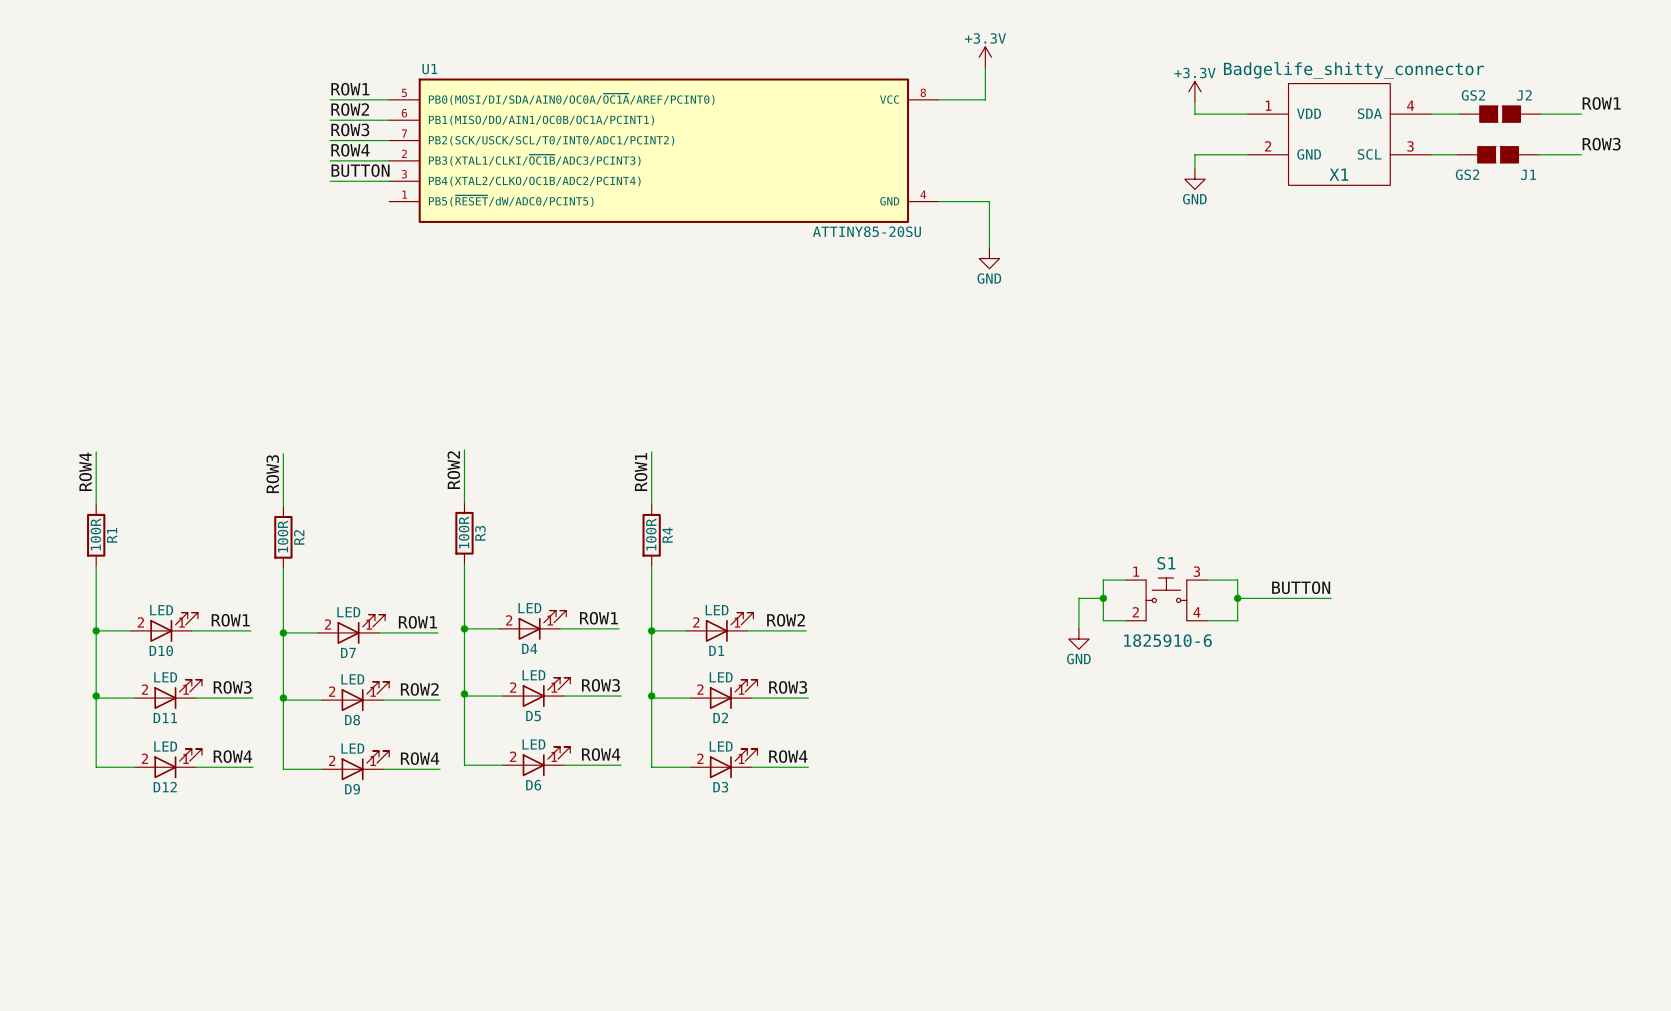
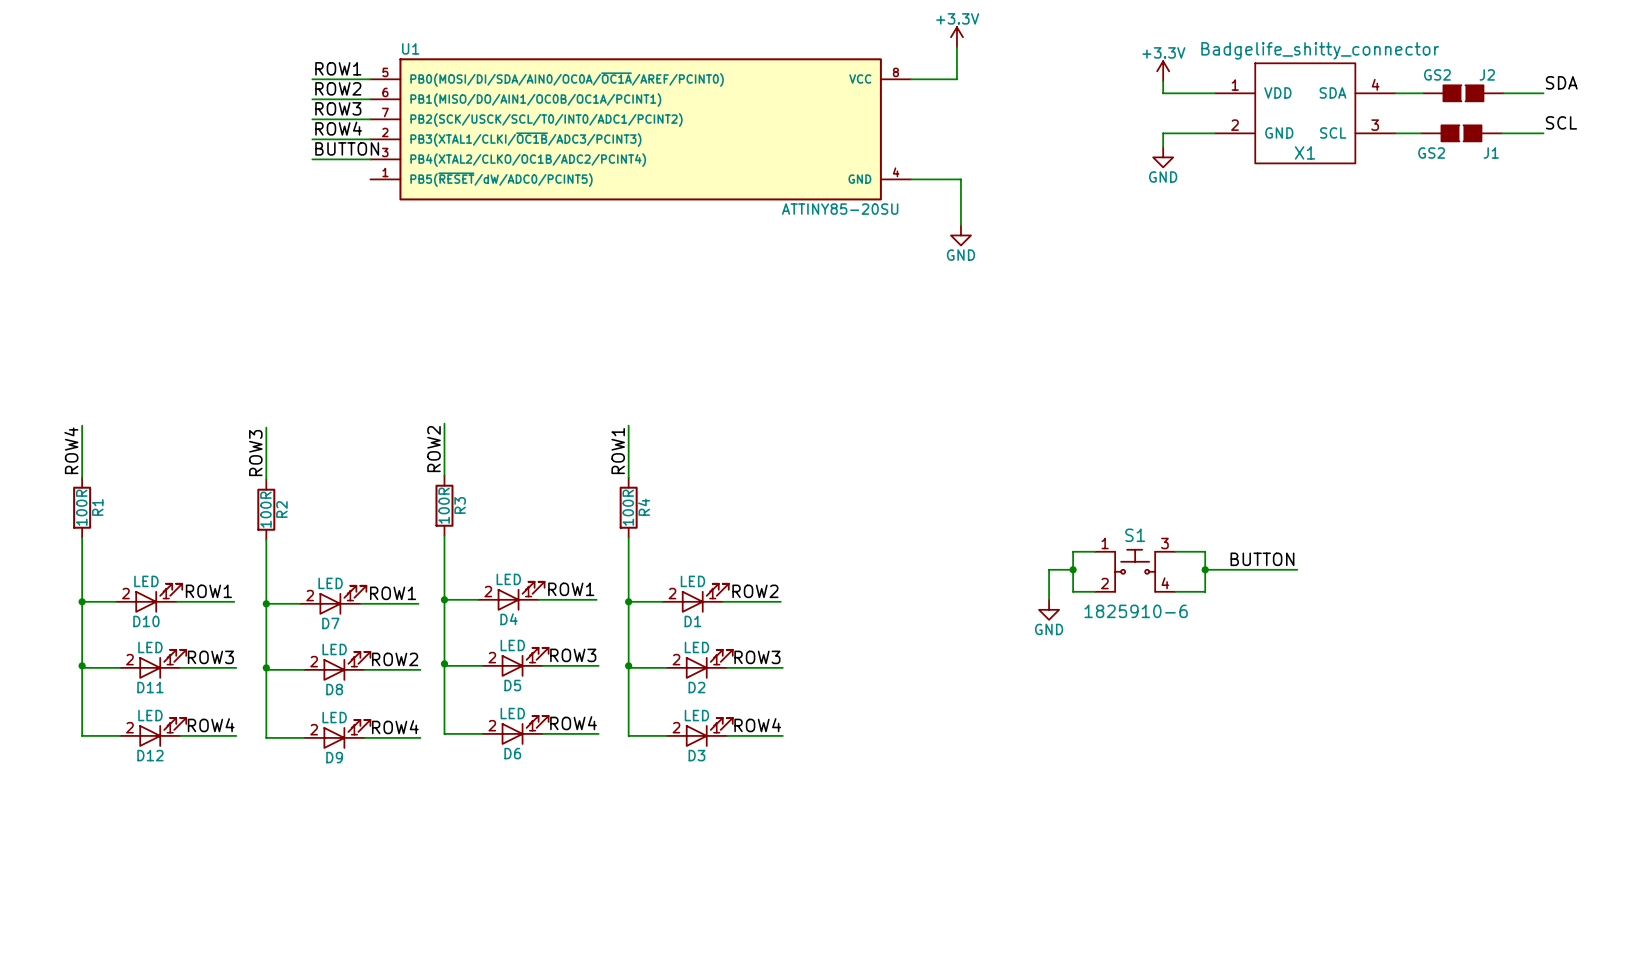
label: ROW1 (1601, 103) -> SDA (1561, 82)
label: ROW3 (1601, 144) -> SCL (1561, 122)

